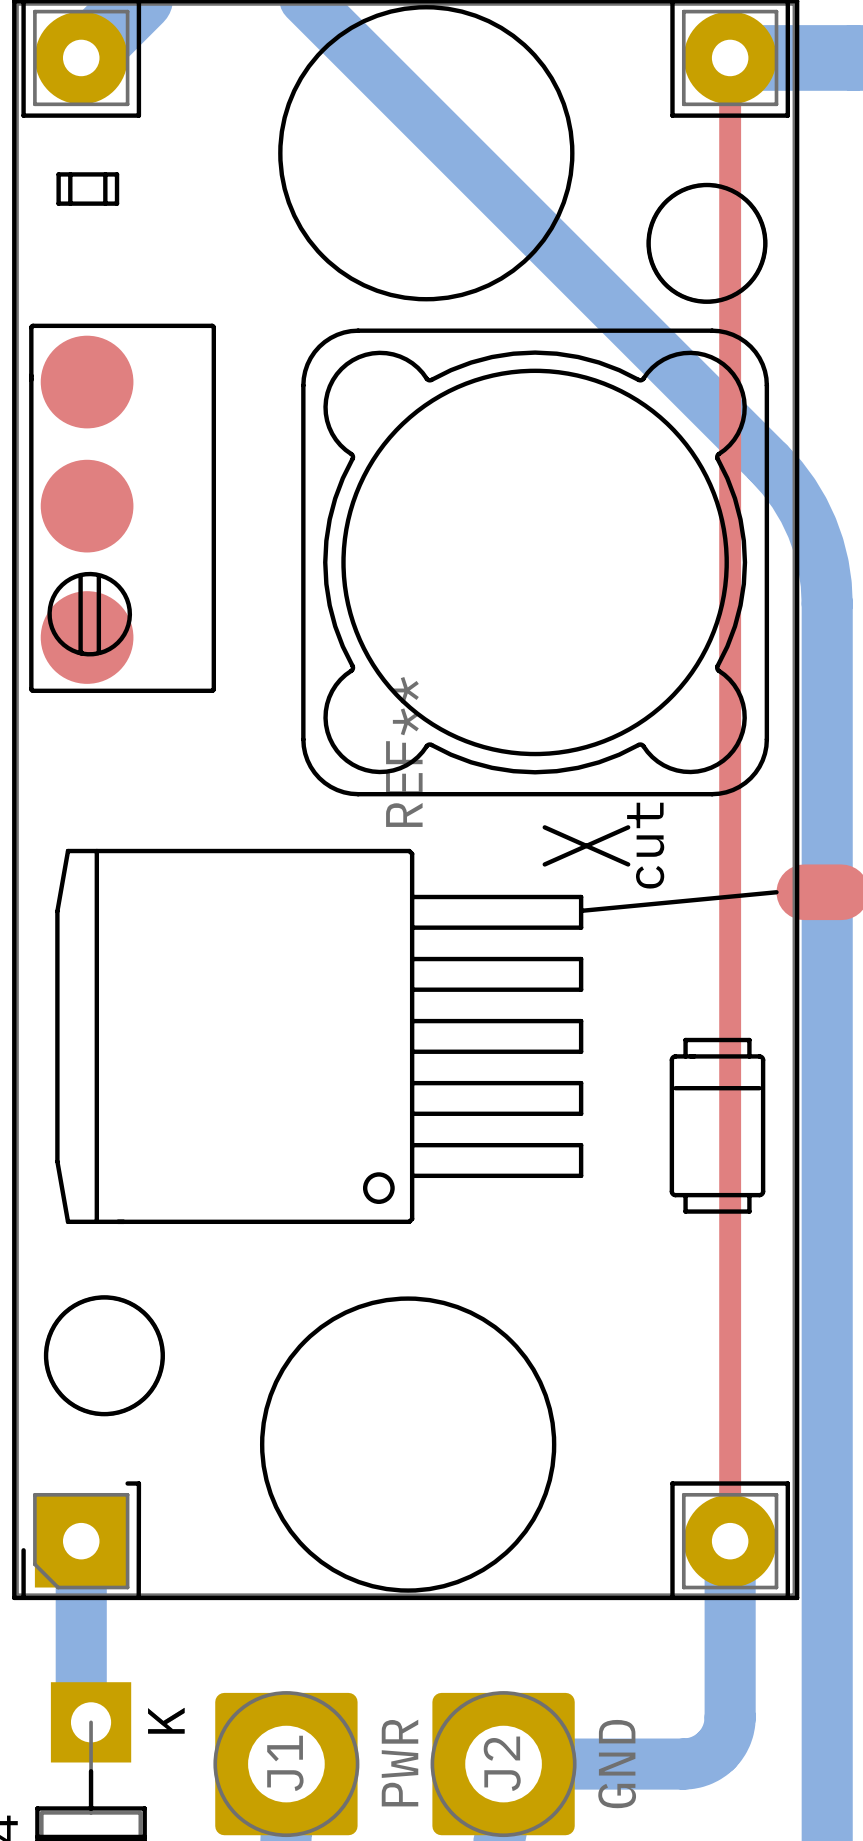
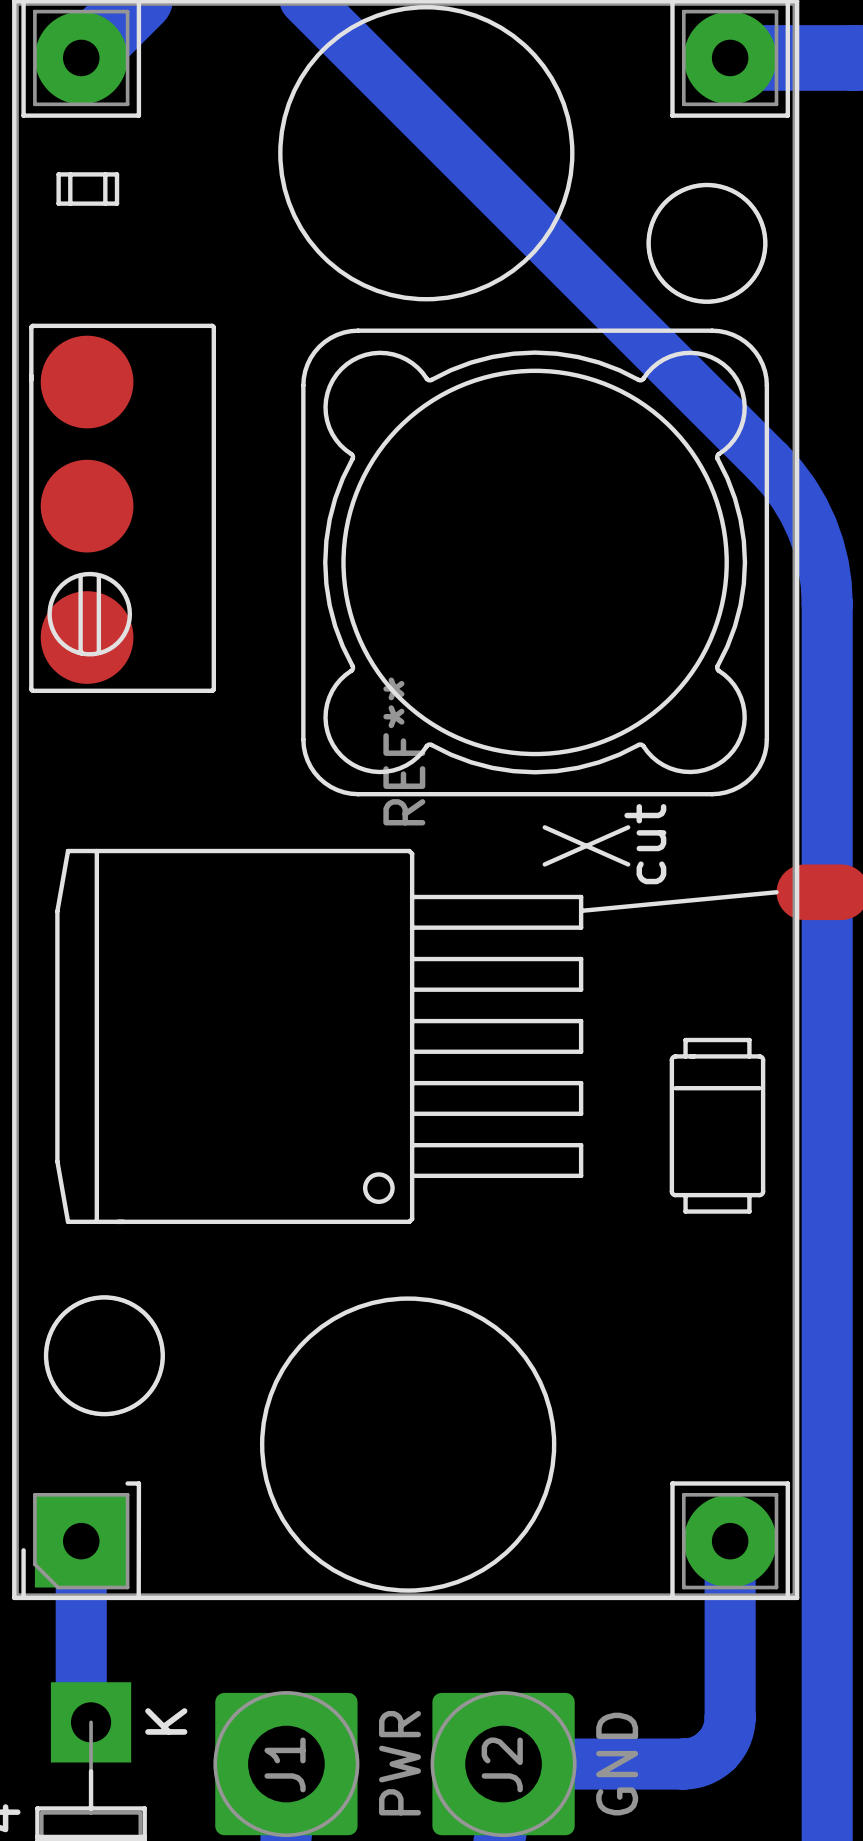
top track: (730, 57) (730, 1541) -> none

